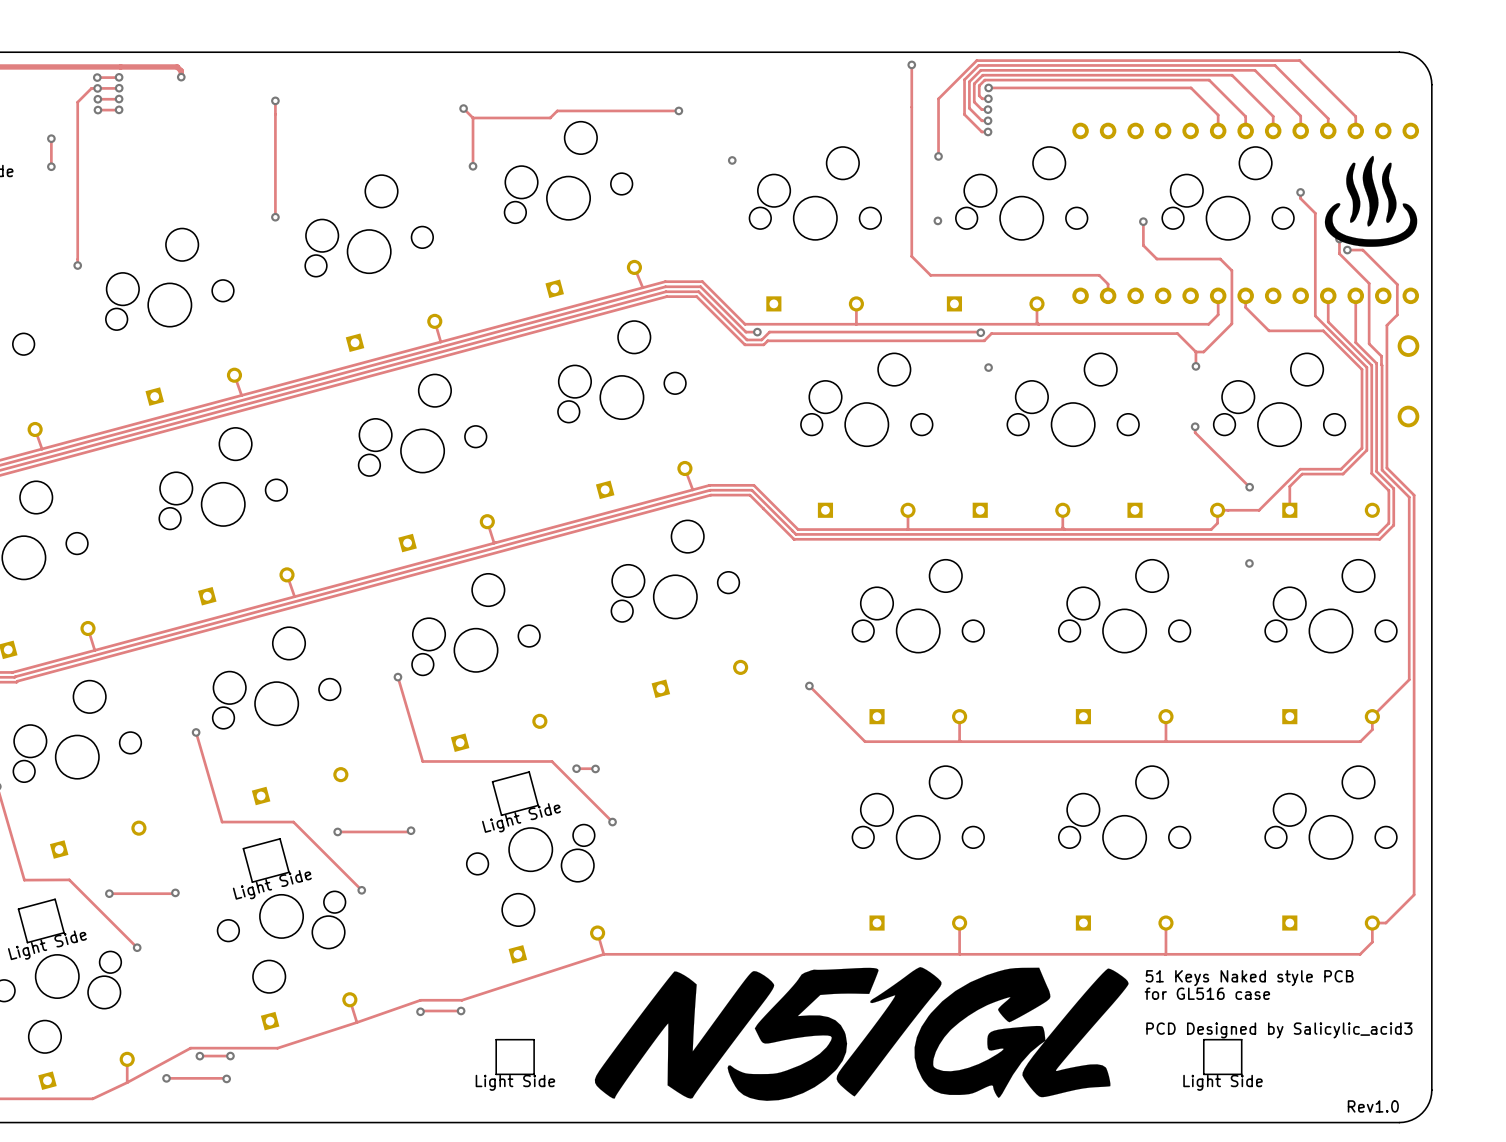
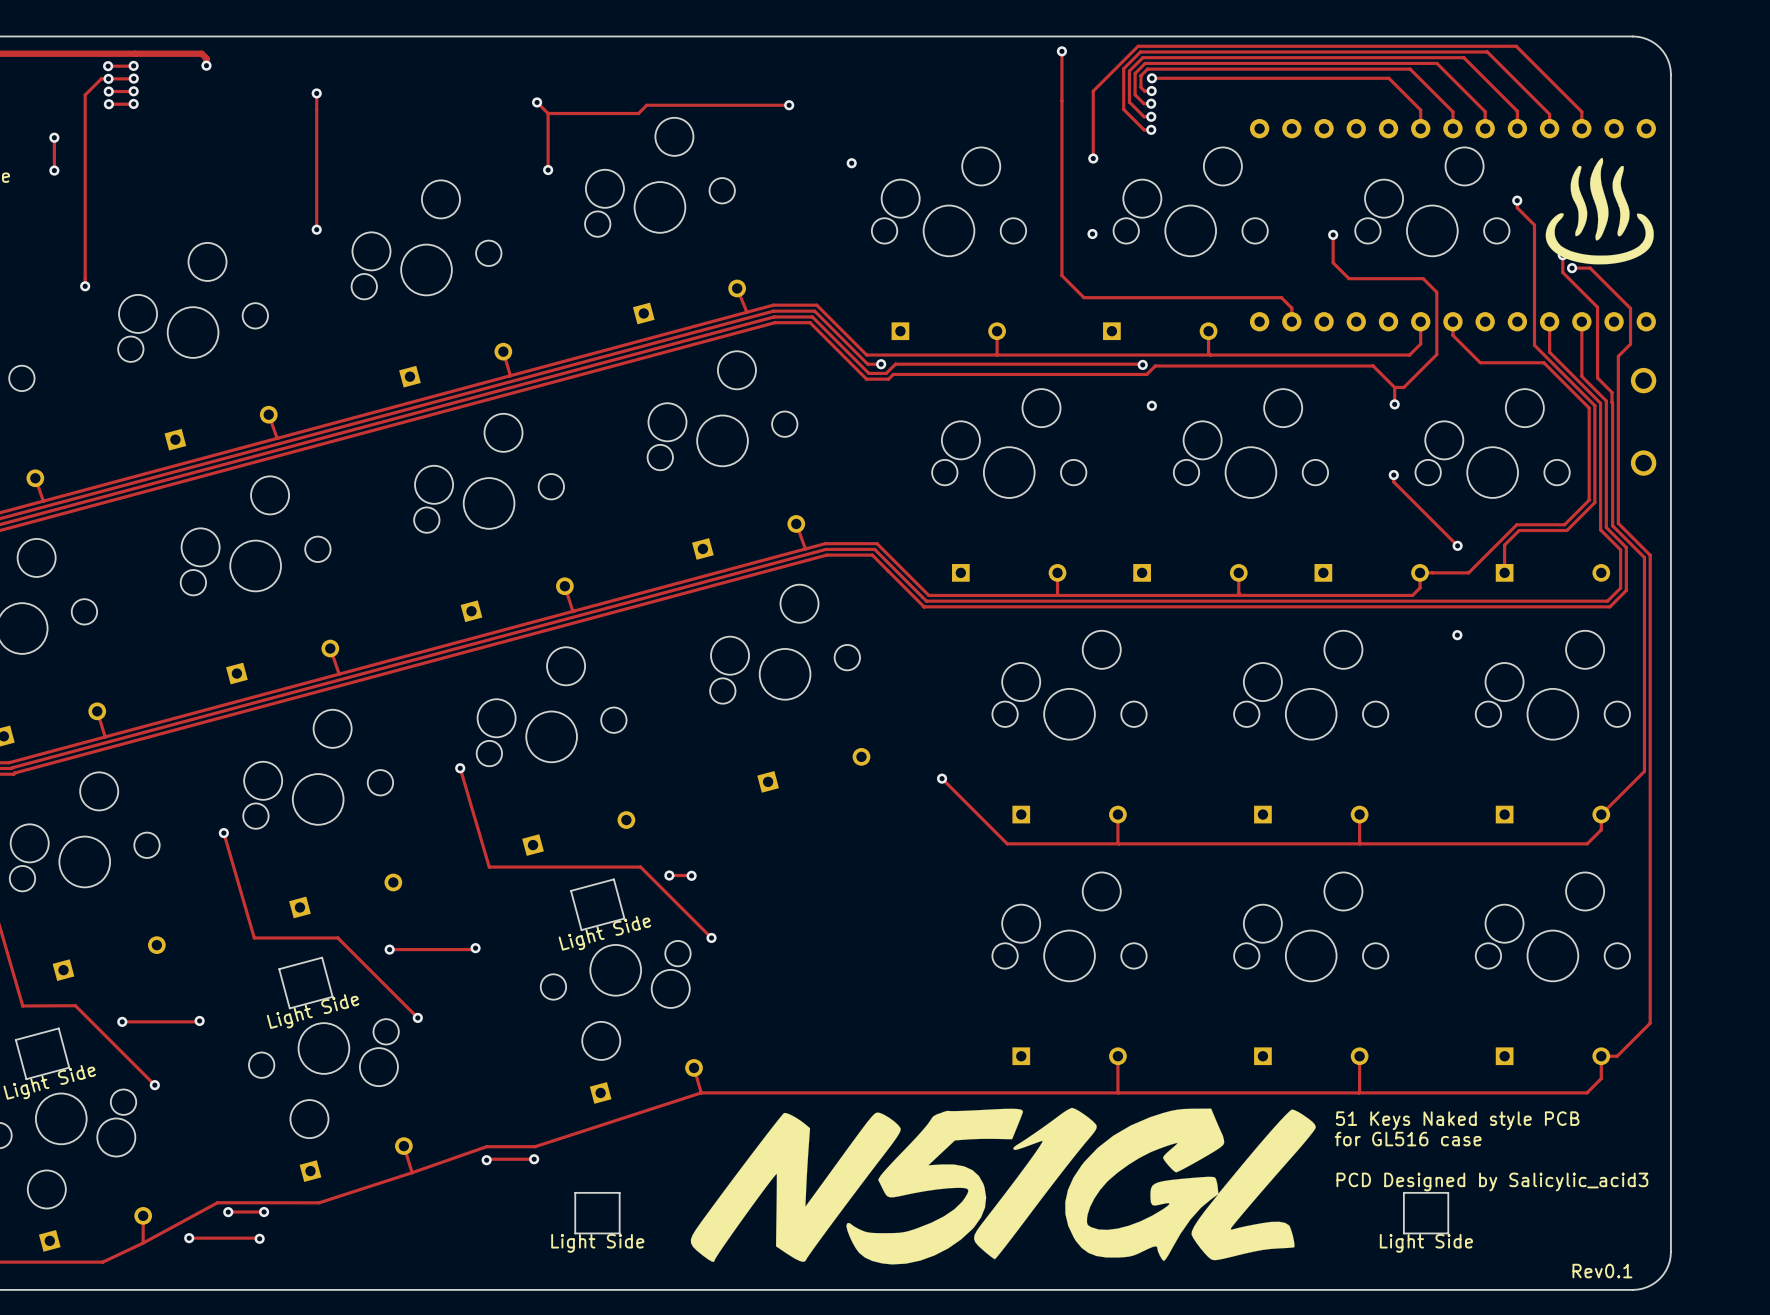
text: Rev1.0 (1373, 1106) -> Rev0.1 (1602, 1271)

